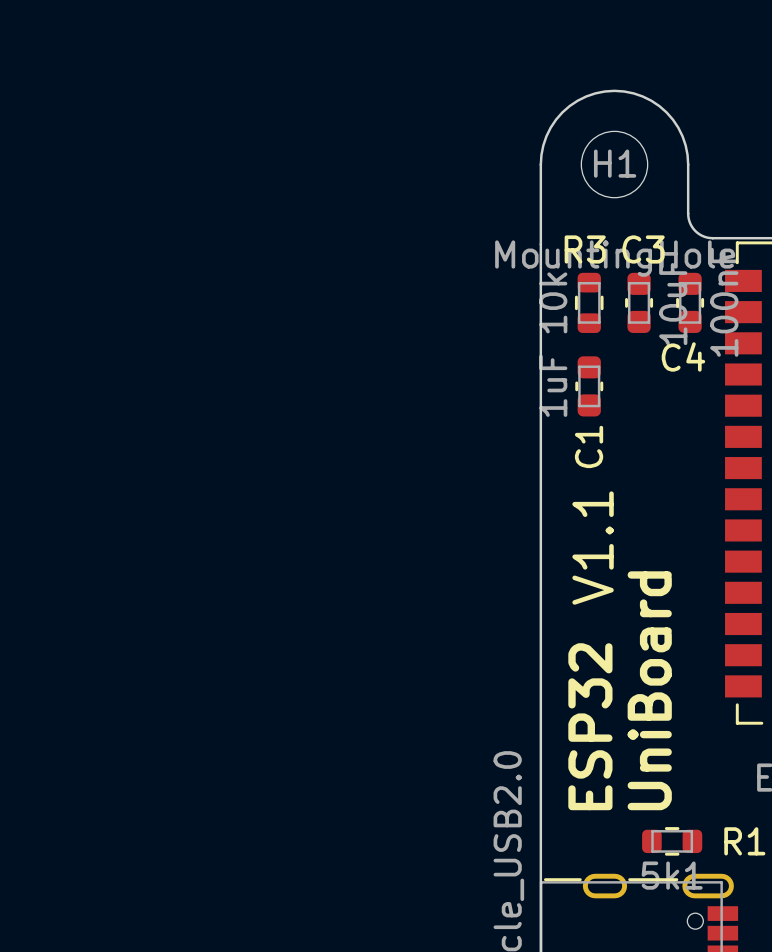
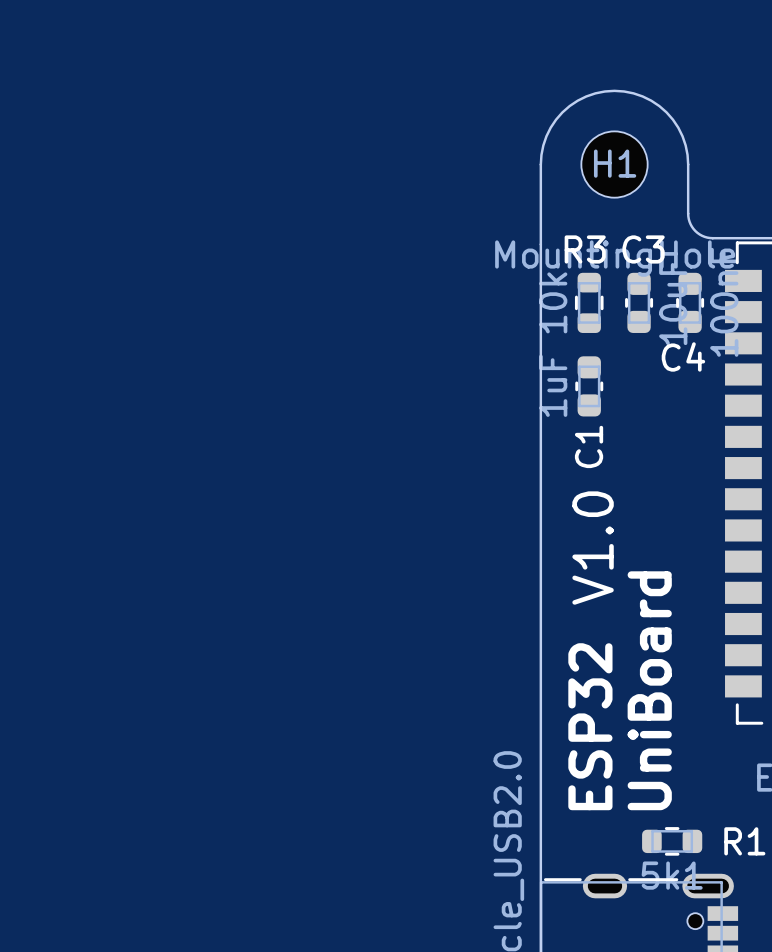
text: V1.1 (593, 548) -> V1.0 (593, 548)

